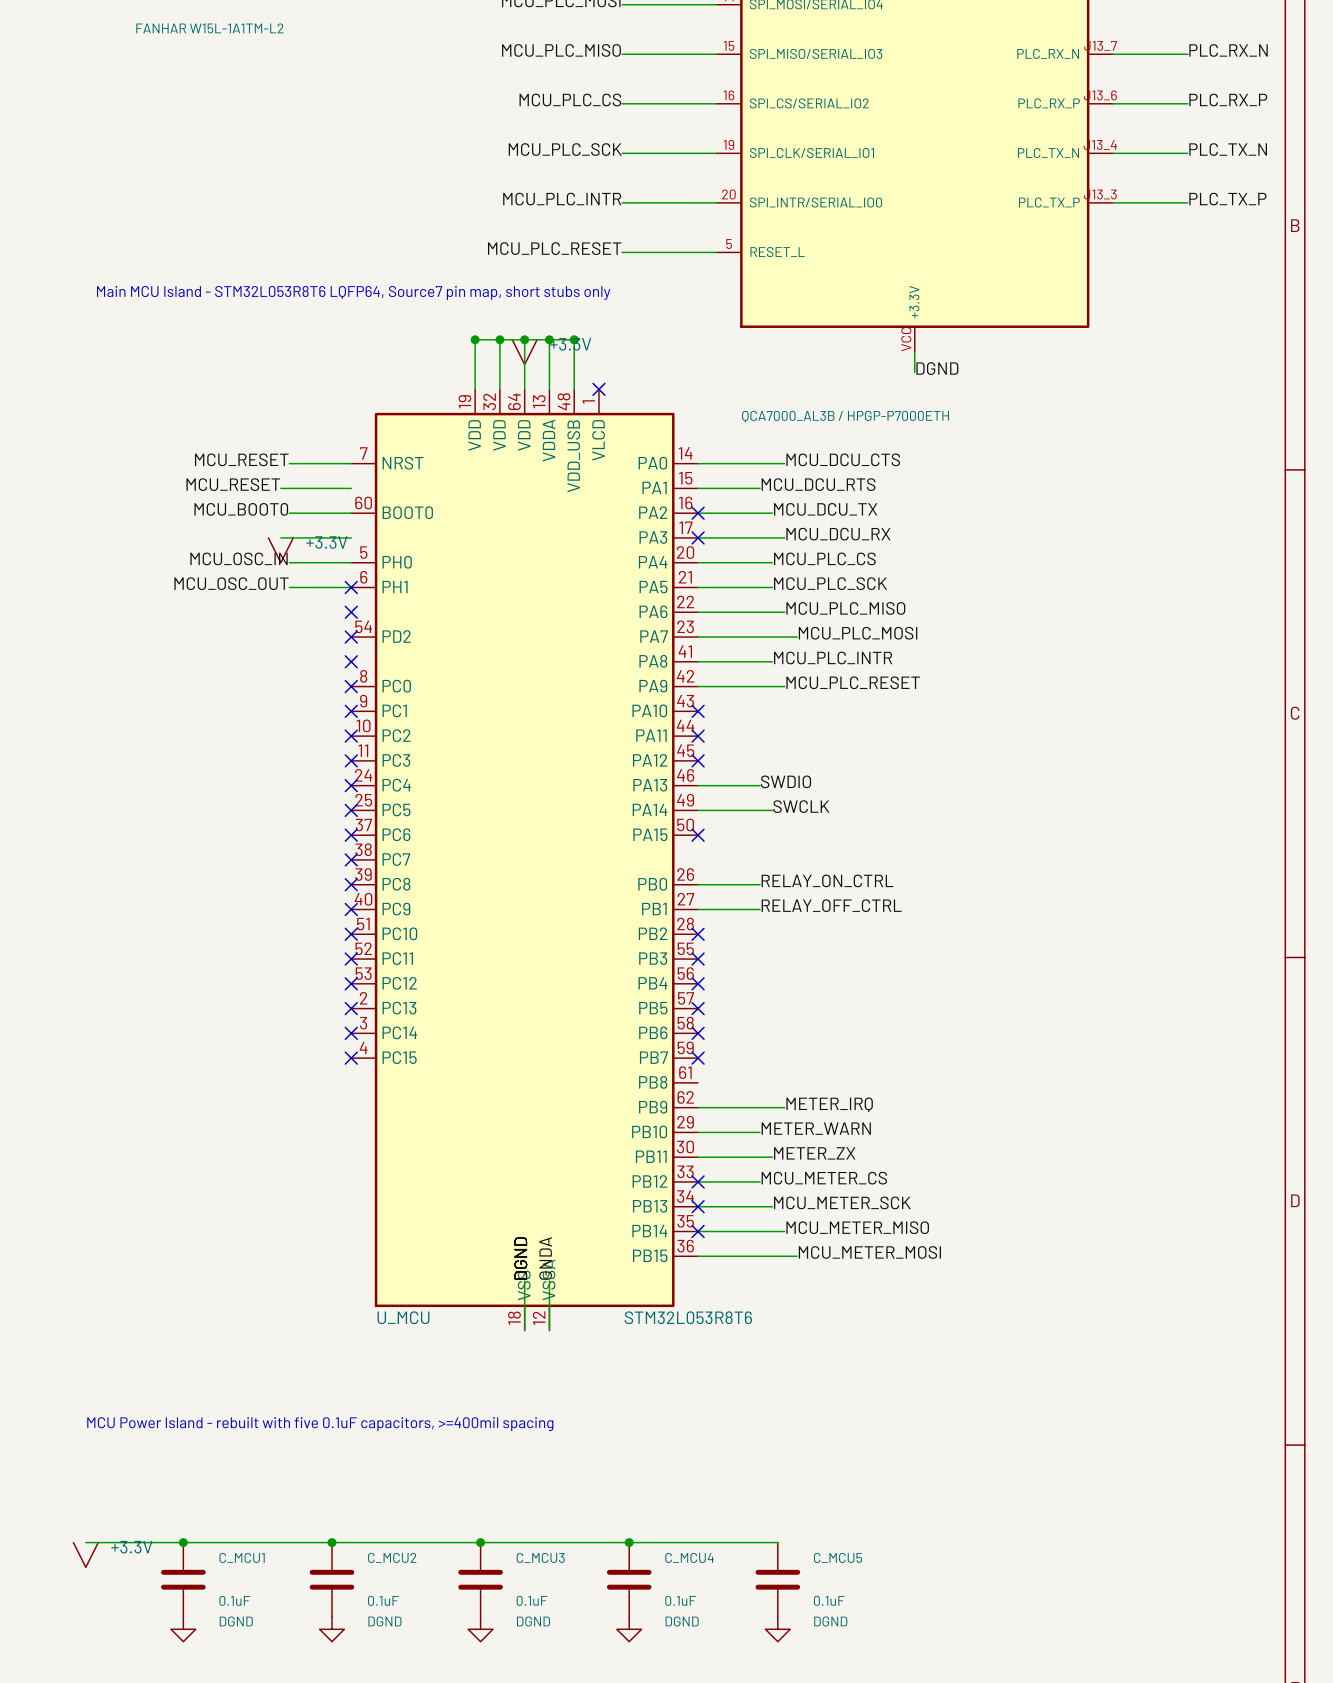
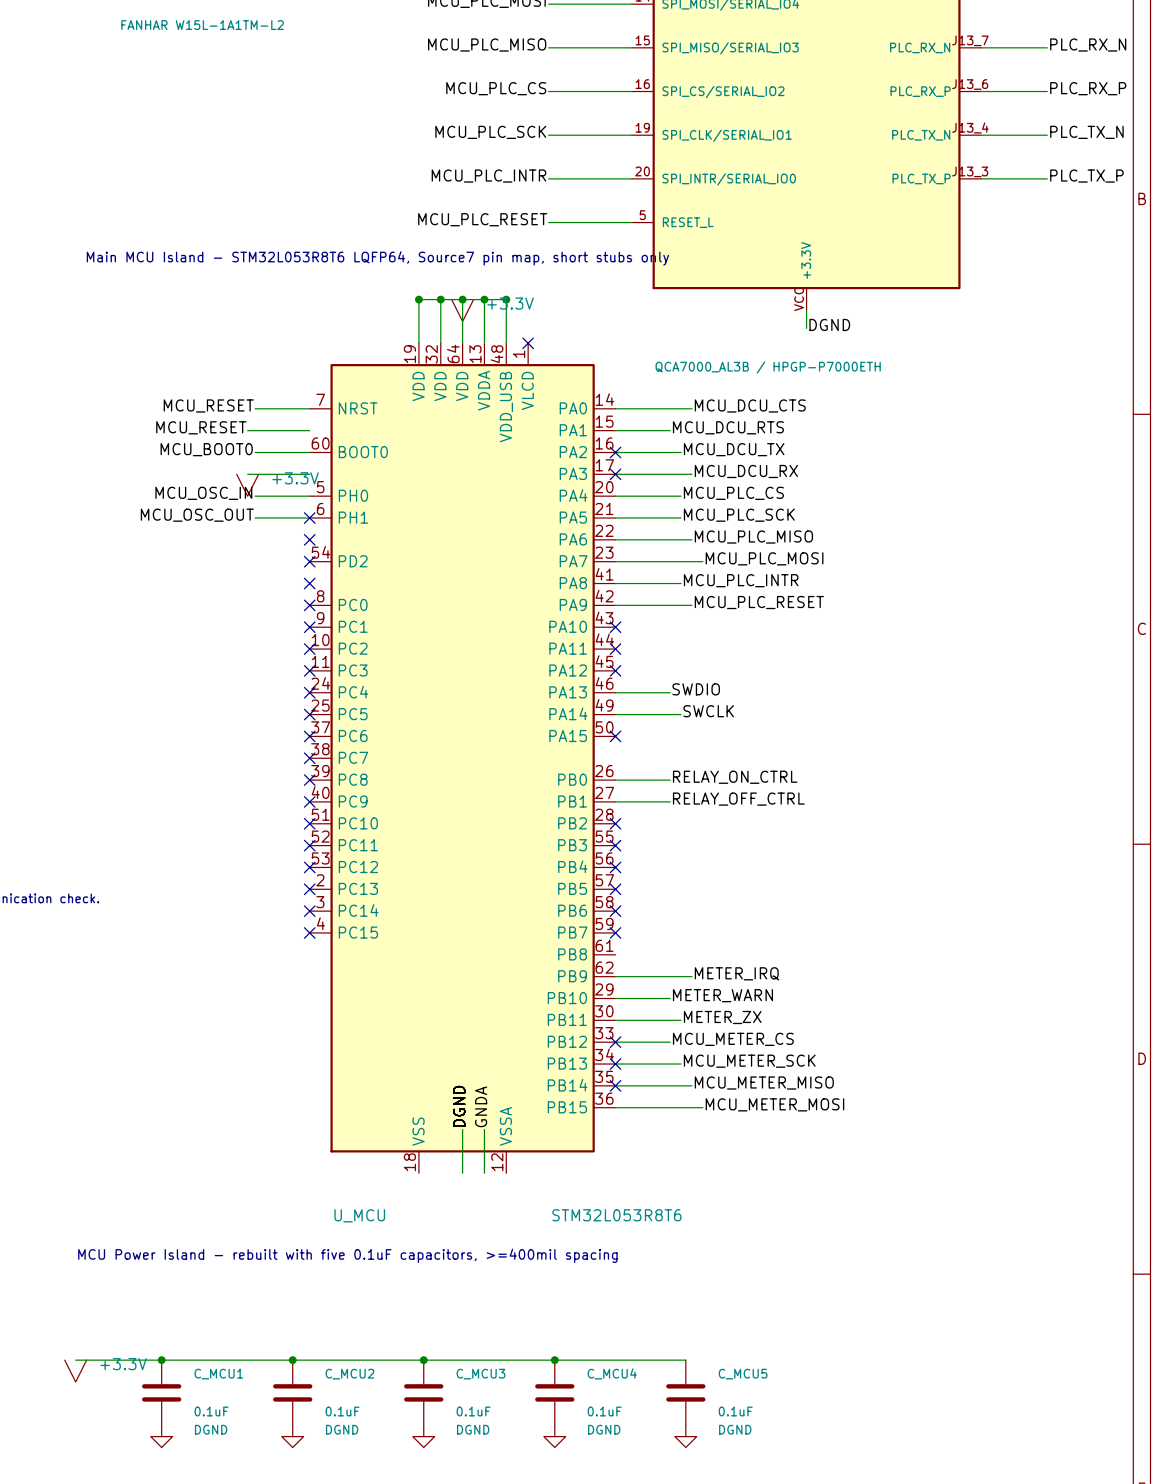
U_MCU symbol: [351, 389, 699, 1331] -> [309, 343, 616, 1174]
U_MCU name position: U_MCU (403, 1317) -> U_MCU (359, 1215)
U_MCU value position: STM32L053R8T6 (688, 1317) -> STM32L053R8T6 (616, 1215)

